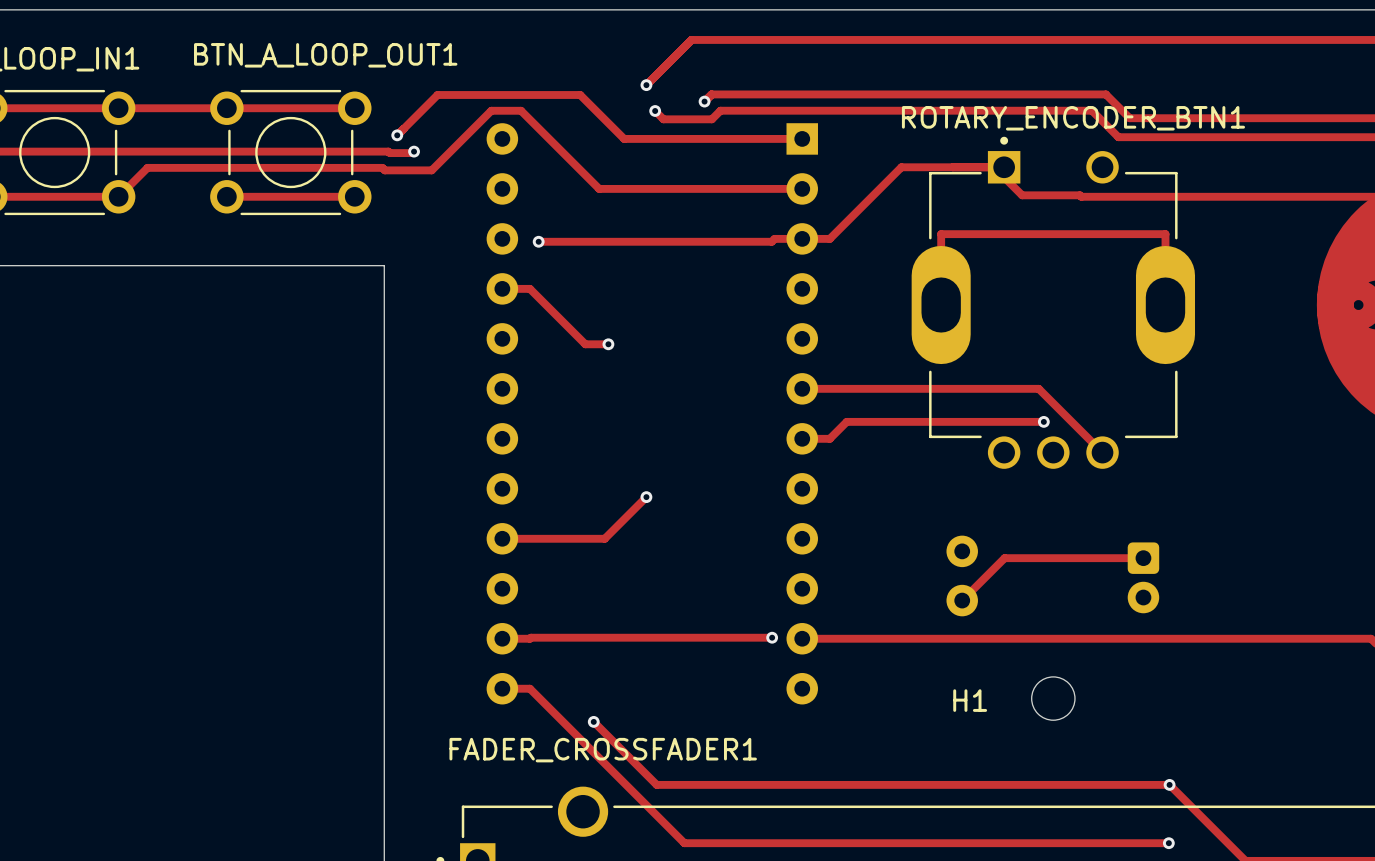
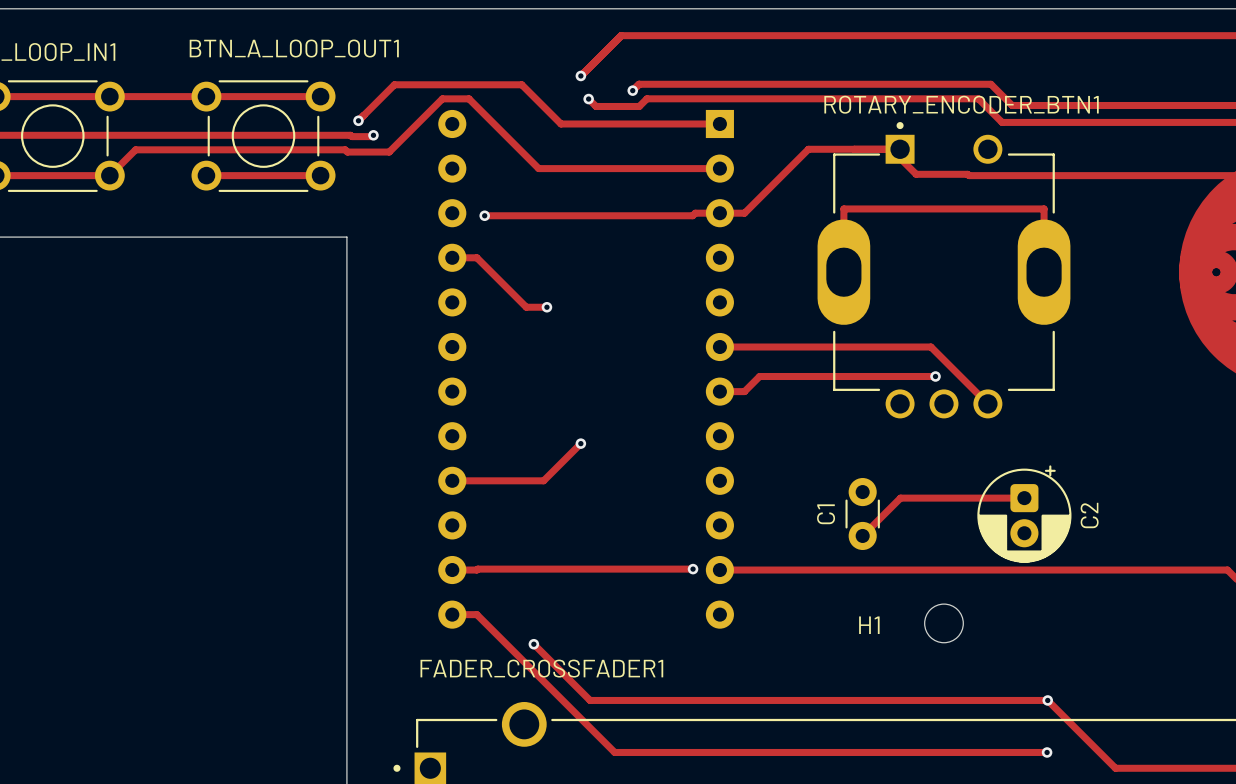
C1 side: bottom (962, 575) -> top (862, 514)
C2 side: bottom (1143, 577) -> top (1024, 514)

